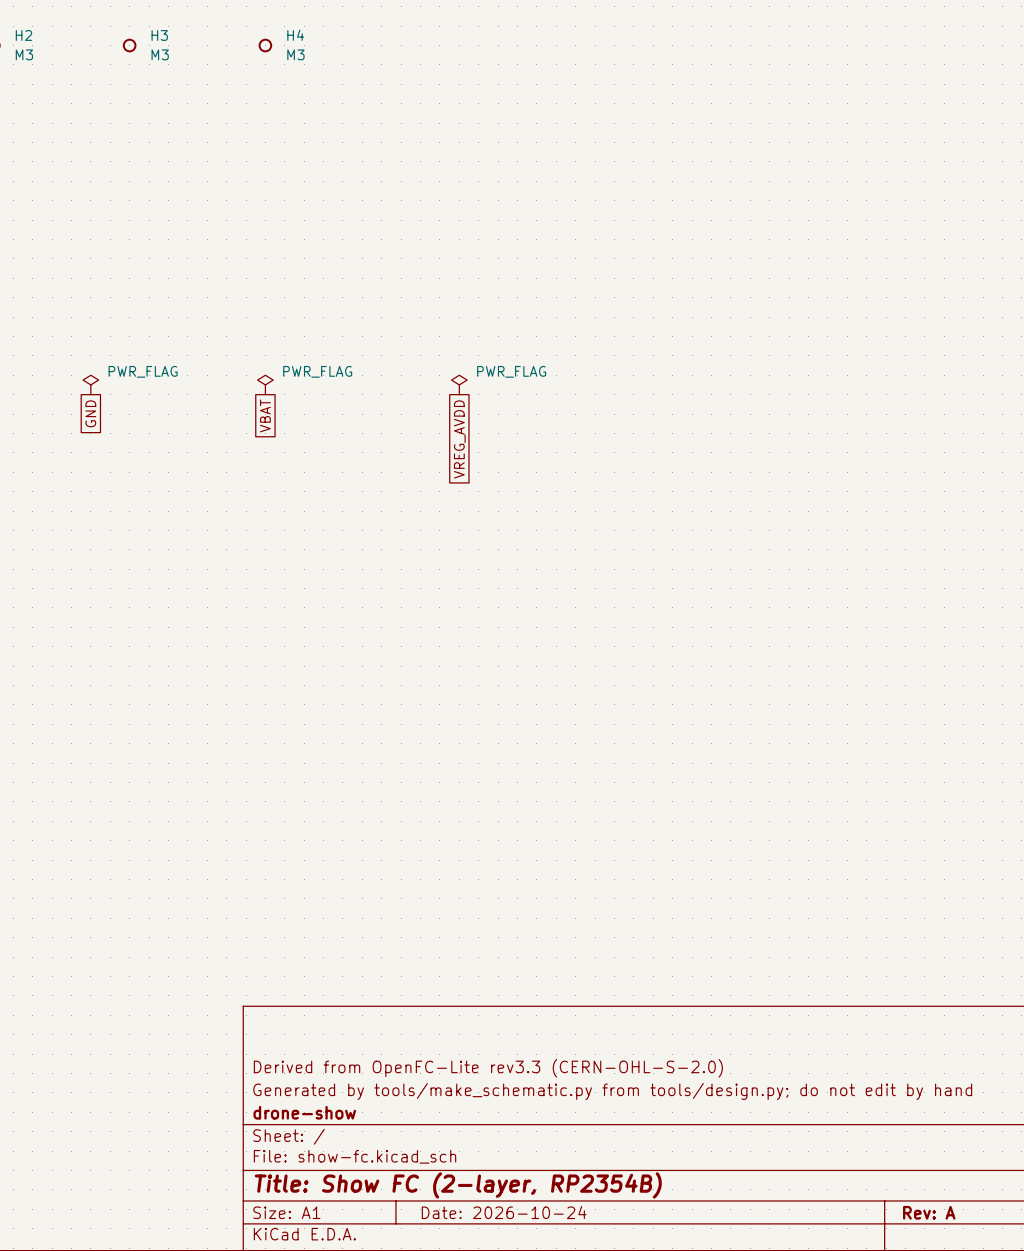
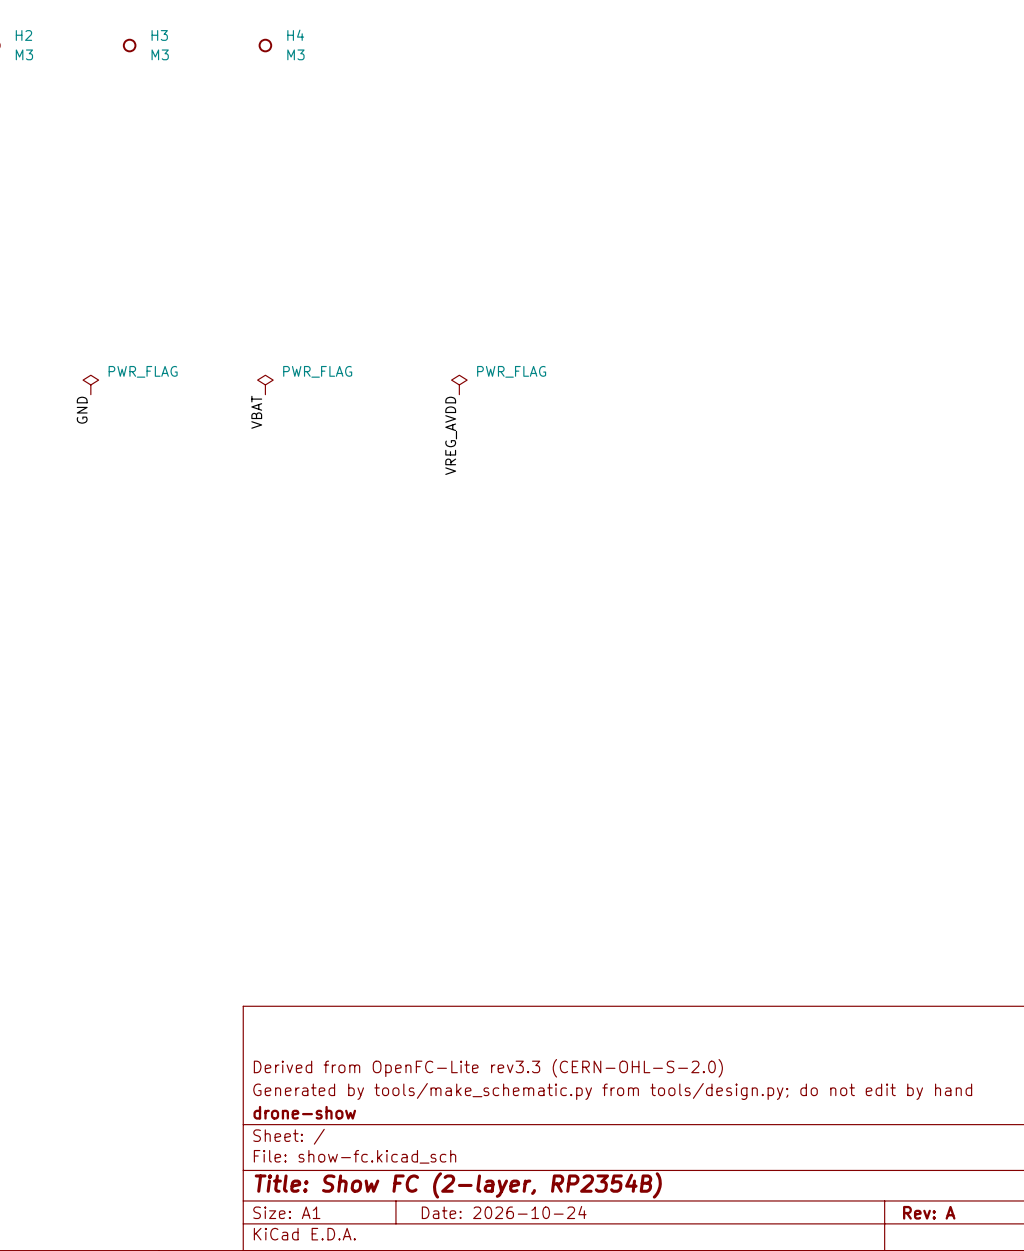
label: none -> GND (82, 410)
label: none -> VBAT (256, 412)
global label: GND (90, 413) -> none
global label: VBAT (265, 415) -> none
label: none -> VREG_AVDD (451, 435)
global label: VREG_AVDD (459, 439) -> none

